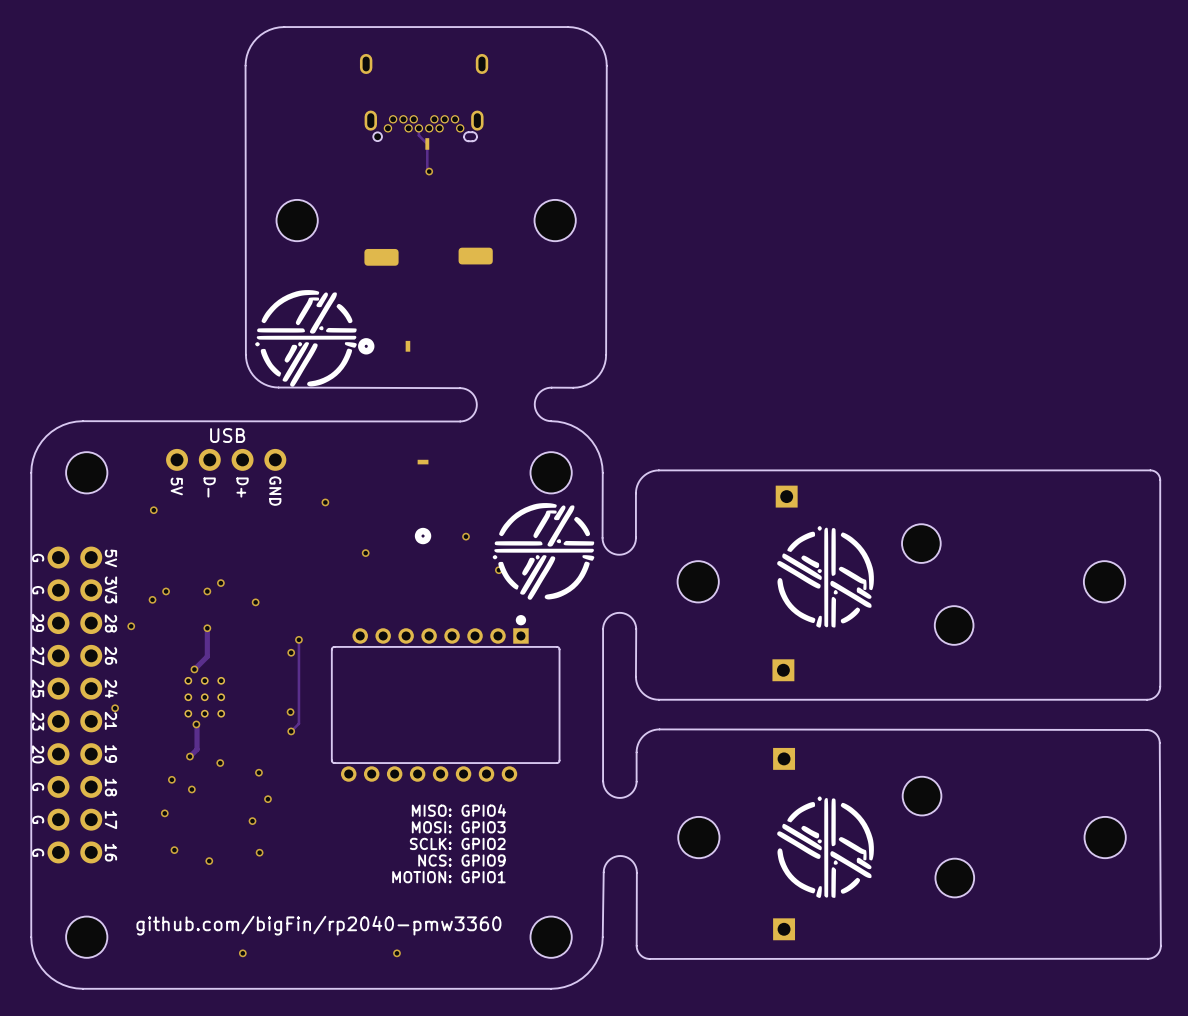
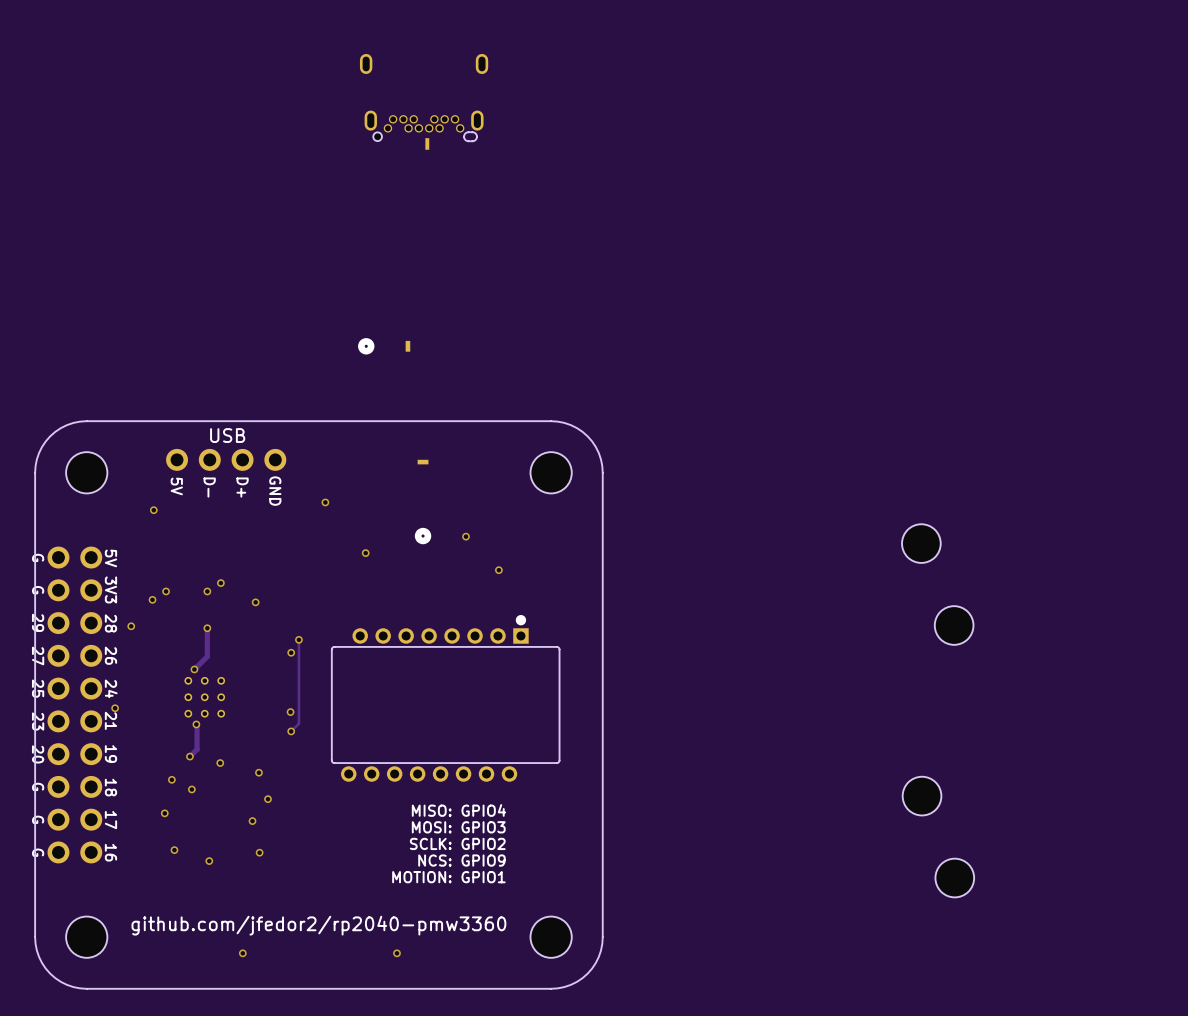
track: (418, 128) (418, 135) (427, 143) (427, 170) -> none
via: (429, 171) -> none
part: (297, 220) -> none
part: (555, 220) -> none
part: (475, 256) -> none
part: (381, 257) -> none
drawing: [255, 290, 357, 387] -> none
part: (786, 496) -> none
drawing: [492, 503, 595, 600] -> none
drawing: [777, 526, 874, 628] -> none
part: (698, 581) -> none
part: (1104, 581) -> none
part: (783, 670) -> none
part: (784, 758) -> none
drawing: [777, 796, 874, 898] -> none
part: (698, 837) -> none
part: (1105, 837) -> none
text: github.com/bigFin/rp2040-pmw3360 (318, 925) -> github.com/jfedor2/rp2040-pmw3360 (318, 925)
part: (784, 929) -> none
board edge: (602, 937) (604, 868) (611, 858) (620, 855) (630, 859) (636, 869) (636, 947) (640, 955) (648, 958) (1147, 958) (1155, 956) (1160, 945) (1159, 743) (1158, 736) (1153, 731) (1146, 729) (656, 729) (645, 734) (637, 744) (636, 781) (634, 789) (626, 796) (617, 797) (608, 793) (603, 783) (603, 629) (606, 619) (615, 613) (625, 613) (632, 619) (636, 628) (637, 684) (644, 694) (656, 699) (1150, 699) (1157, 694) (1160, 686) (1159, 476) (1155, 471) (1150, 470) (656, 470) (644, 475) (637, 485) (634, 545) (623, 554) (611, 552) (605, 547) (602, 539) (602, 466) (595, 446) (587, 436) (576, 428) (541, 417) (535, 410) (534, 404) (537, 395) (545, 388) (577, 387) (589, 383) (599, 374) (605, 359) (606, 65) (601, 46) (587, 32) (568, 27) (279, 27) (269, 29) (256, 38) (248, 50) (245, 60) (245, 354) (249, 368) (261, 382) (275, 387) (463, 388) (474, 396) (476, 408) (471, 417) (460, 421) (76, 421) (57, 428) (41, 441) (33, 459) (31, 472) (31, 943) (38, 963) (51, 978) (69, 987) (86, 988) -> (602, 937) (602, 472) (598, 453) (587, 436) (570, 425) (551, 421) (79, 421) (66, 425) (50, 436) (42, 446) (35, 466) (35, 937) (39, 956) (50, 973) (66, 984) (86, 988)

